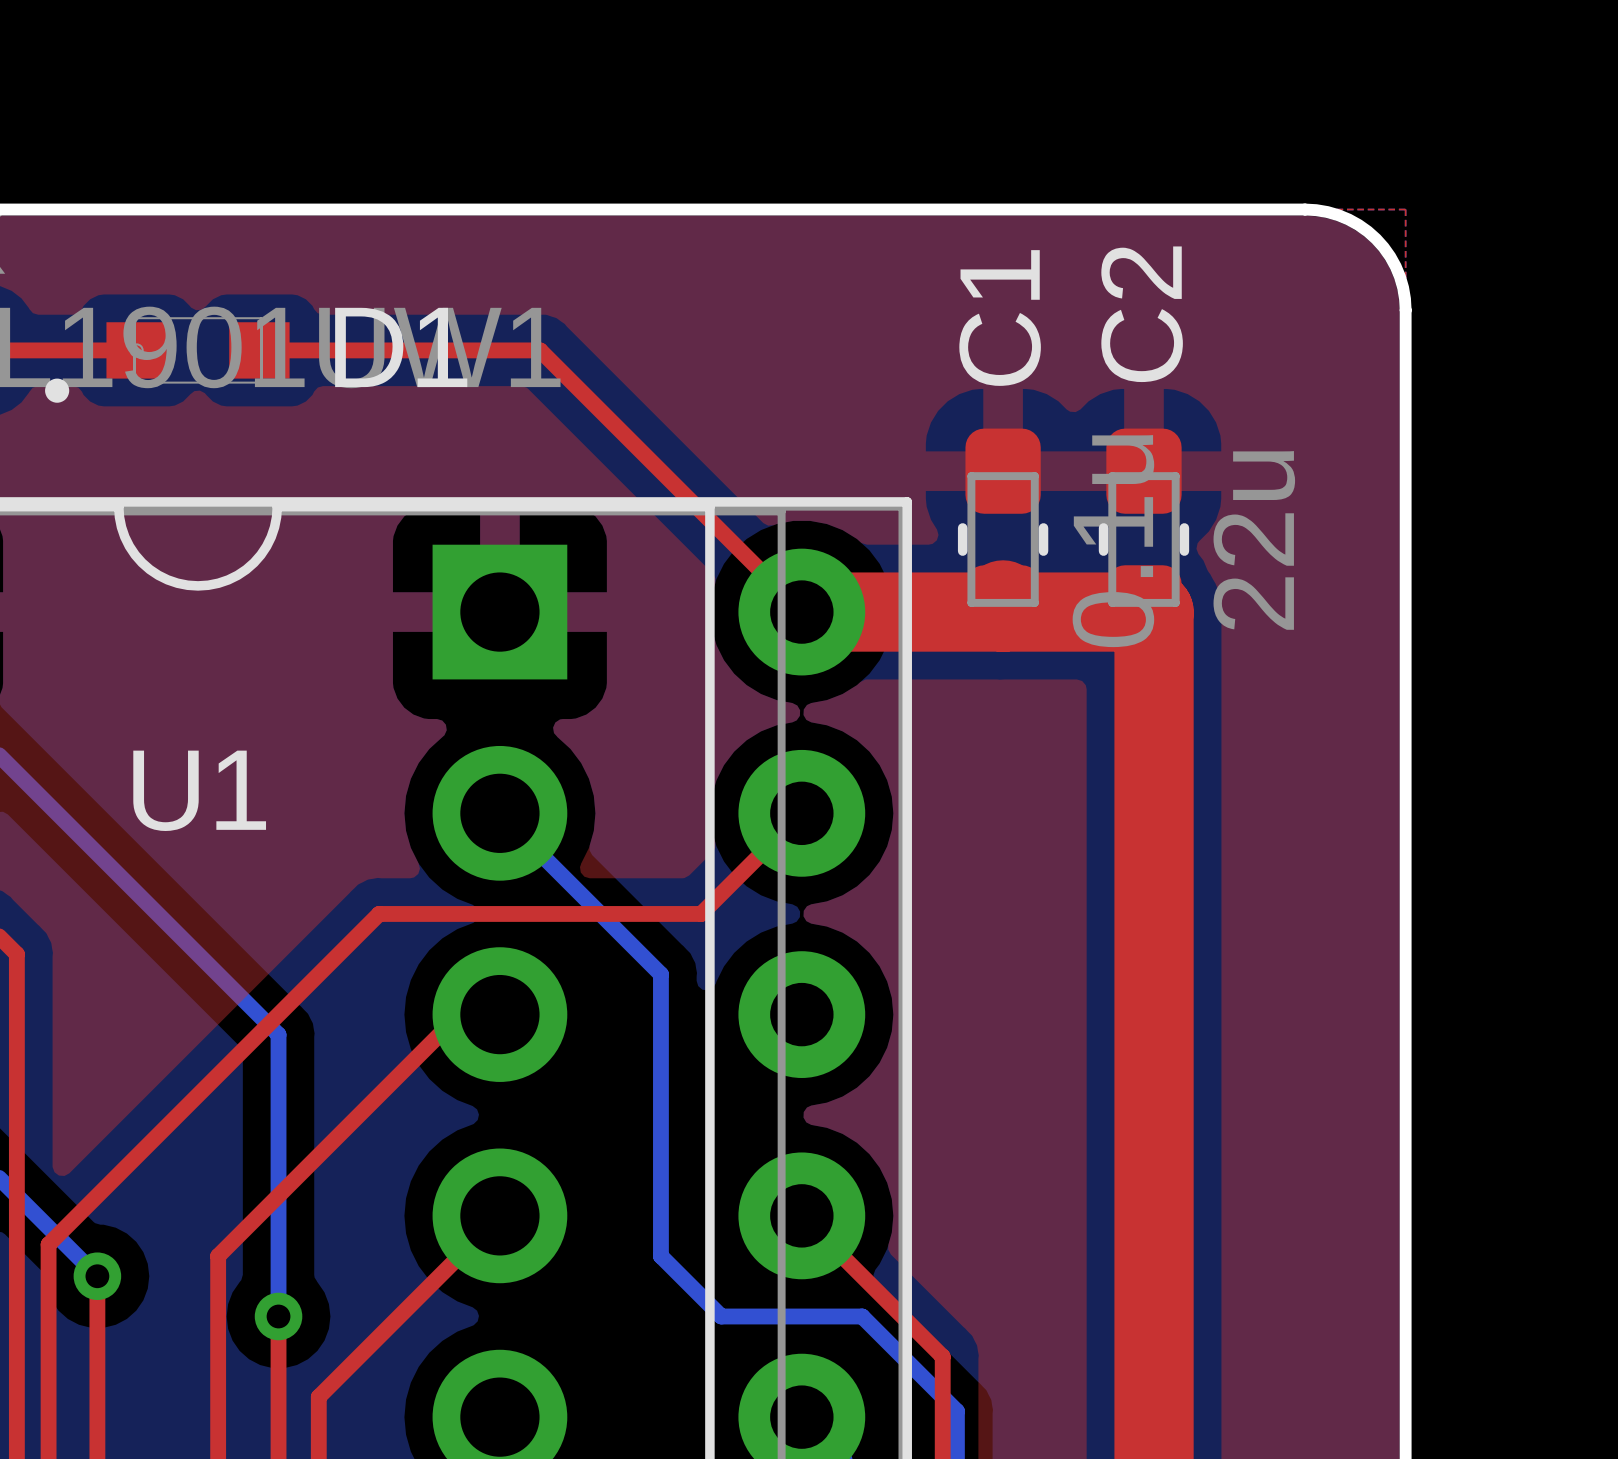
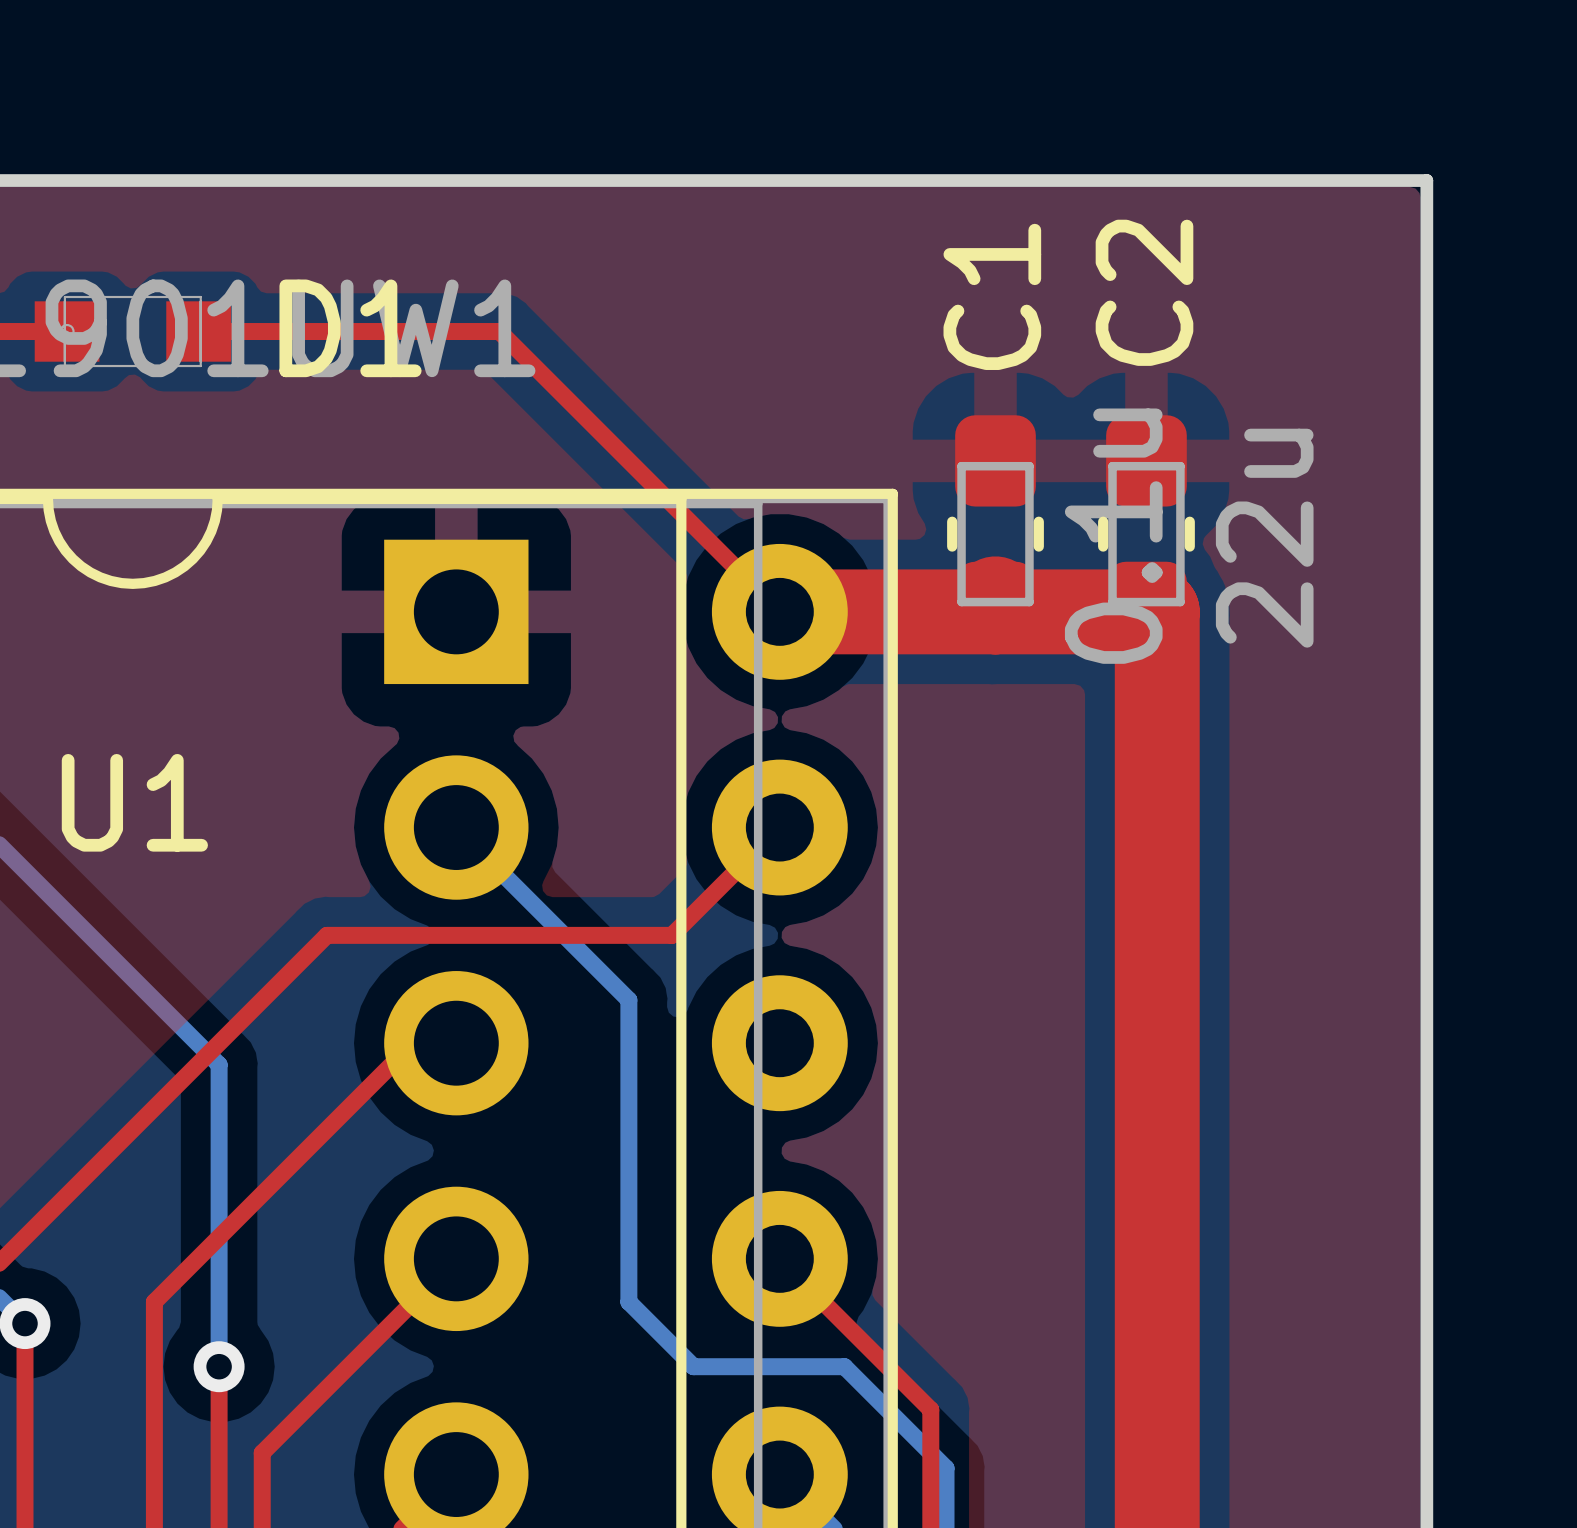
board edge: (1305, 209) (1327, 212) (1348, 219) (1376, 239) (1395, 266) (1403, 287) (1405, 310) -> (1319, 180) (1426, 180) (1426, 288)

